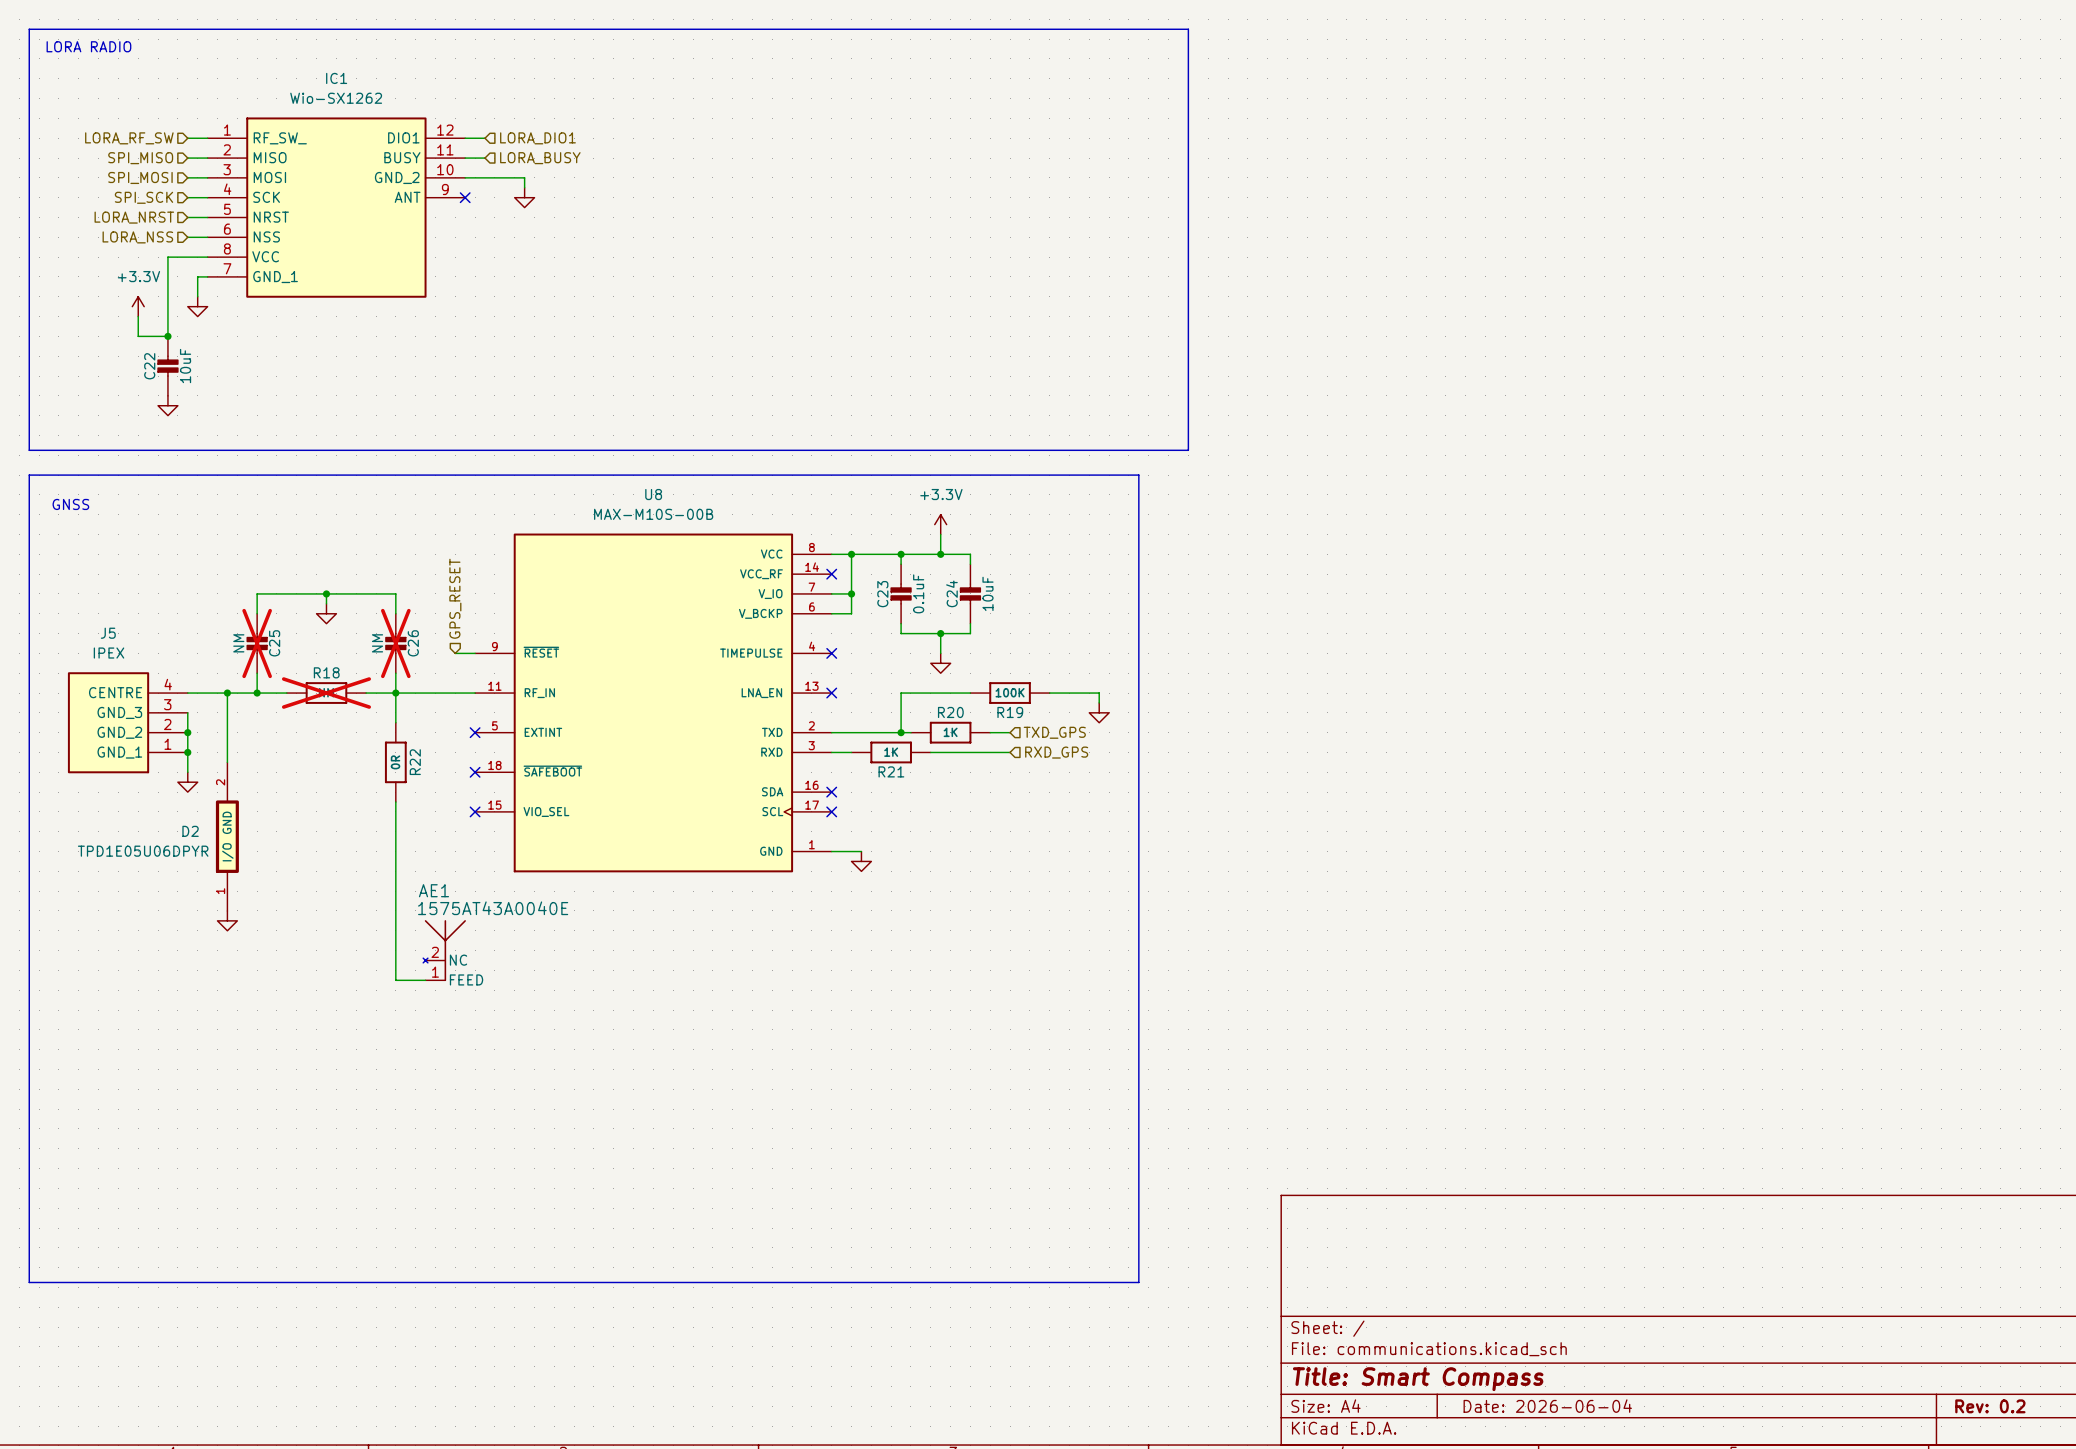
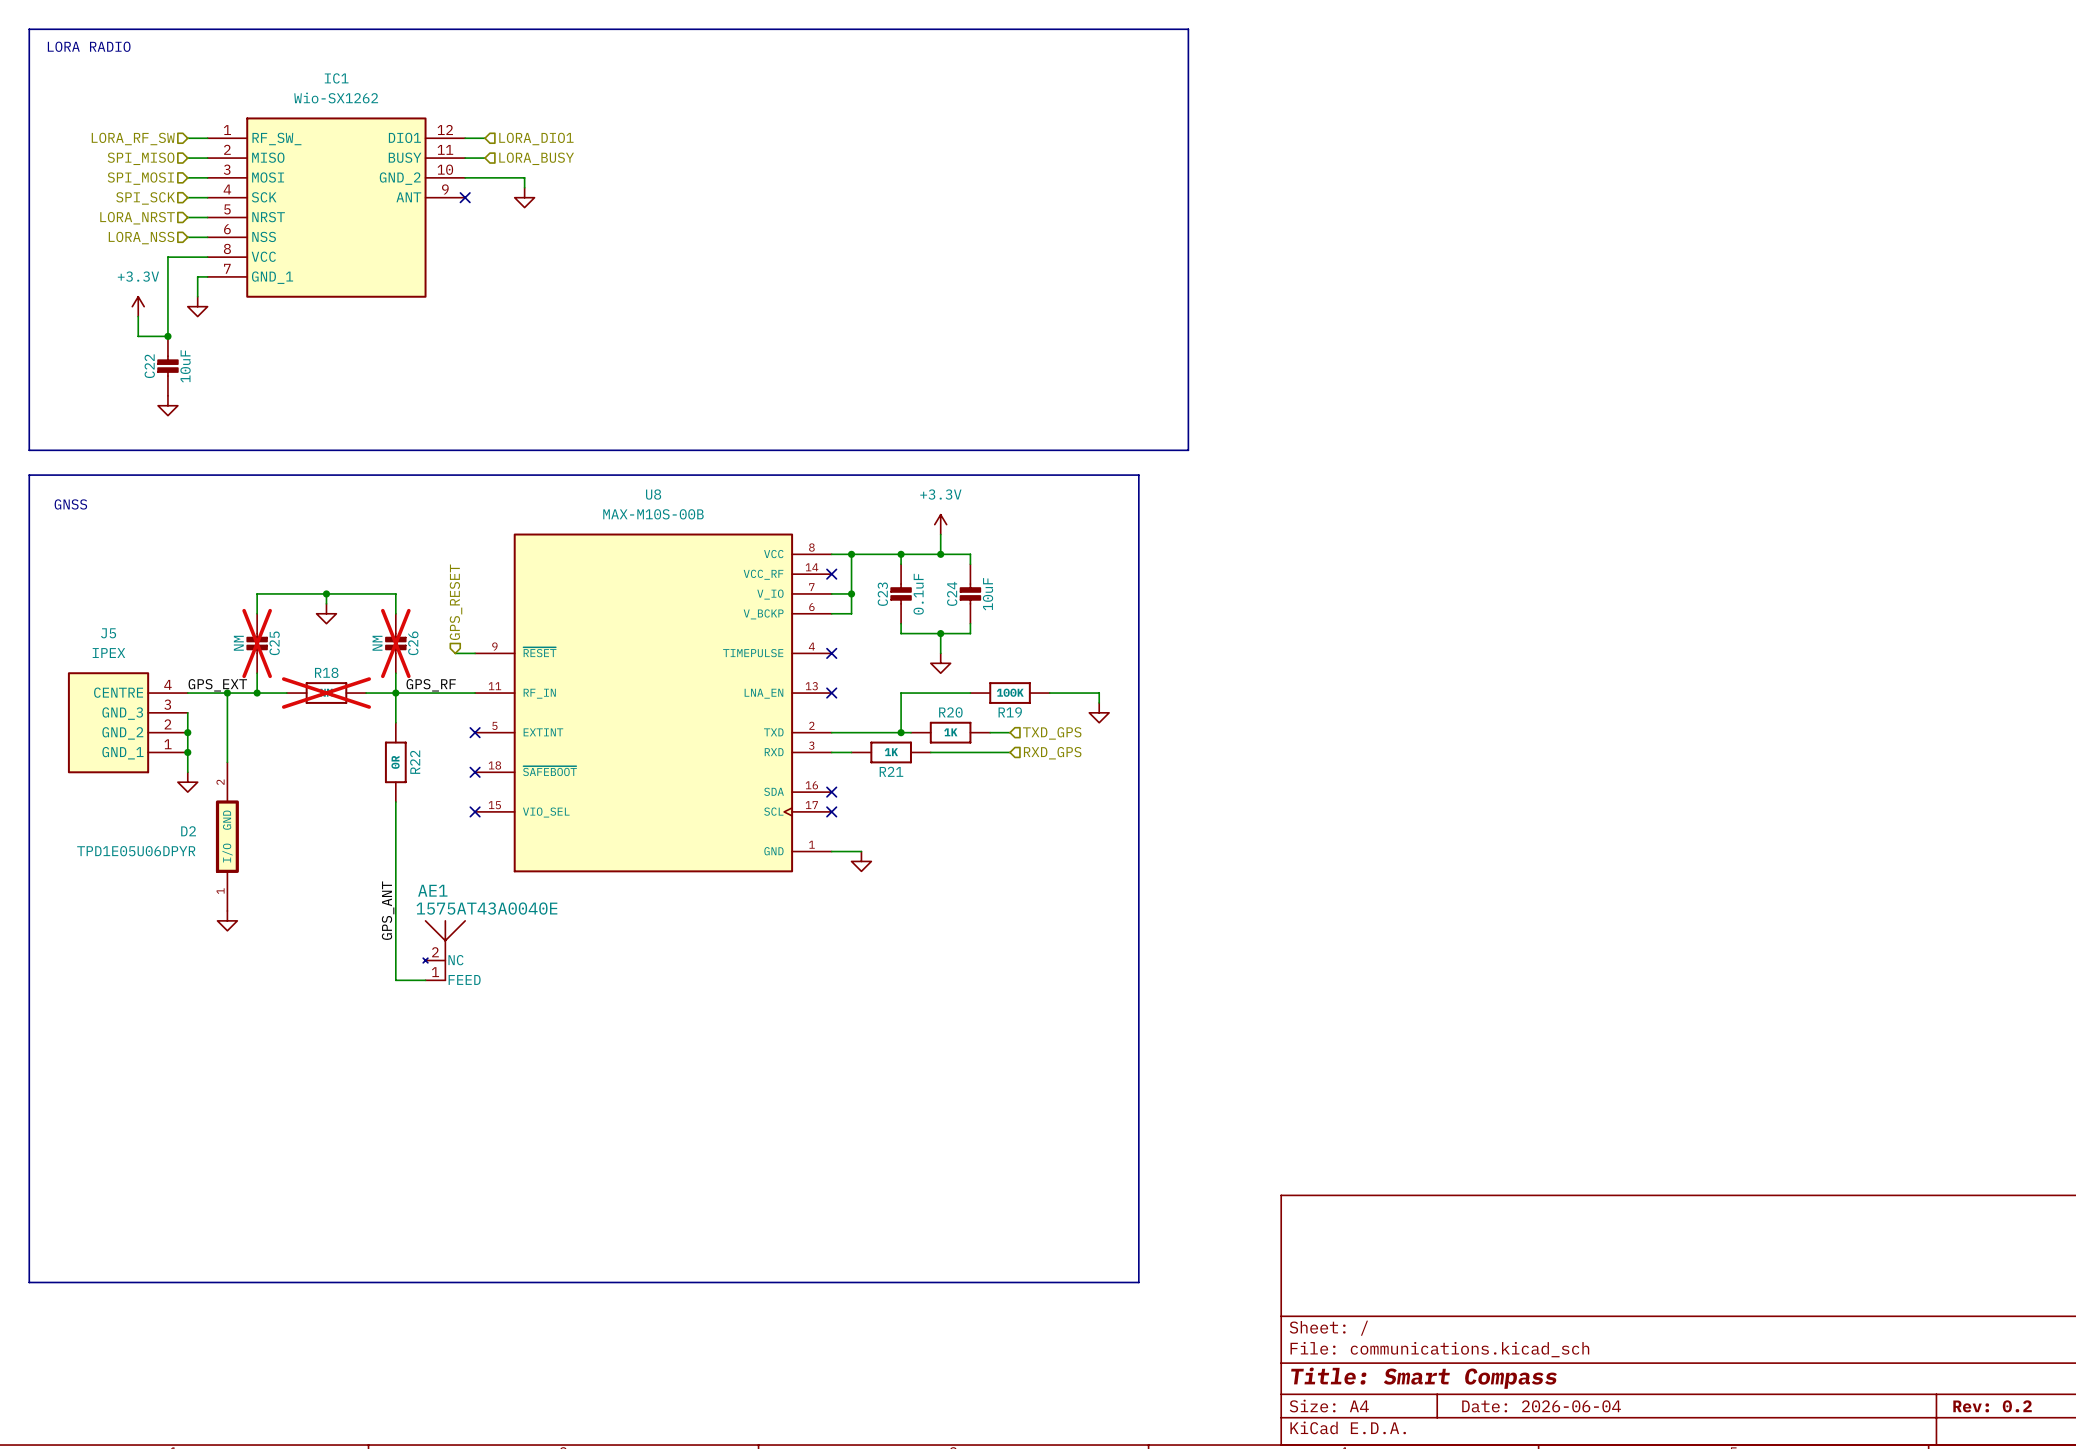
label: none -> GPS_EXT (217, 685)
label: none -> GPS_RF (431, 685)
label: none -> GPS_ANT (388, 910)

